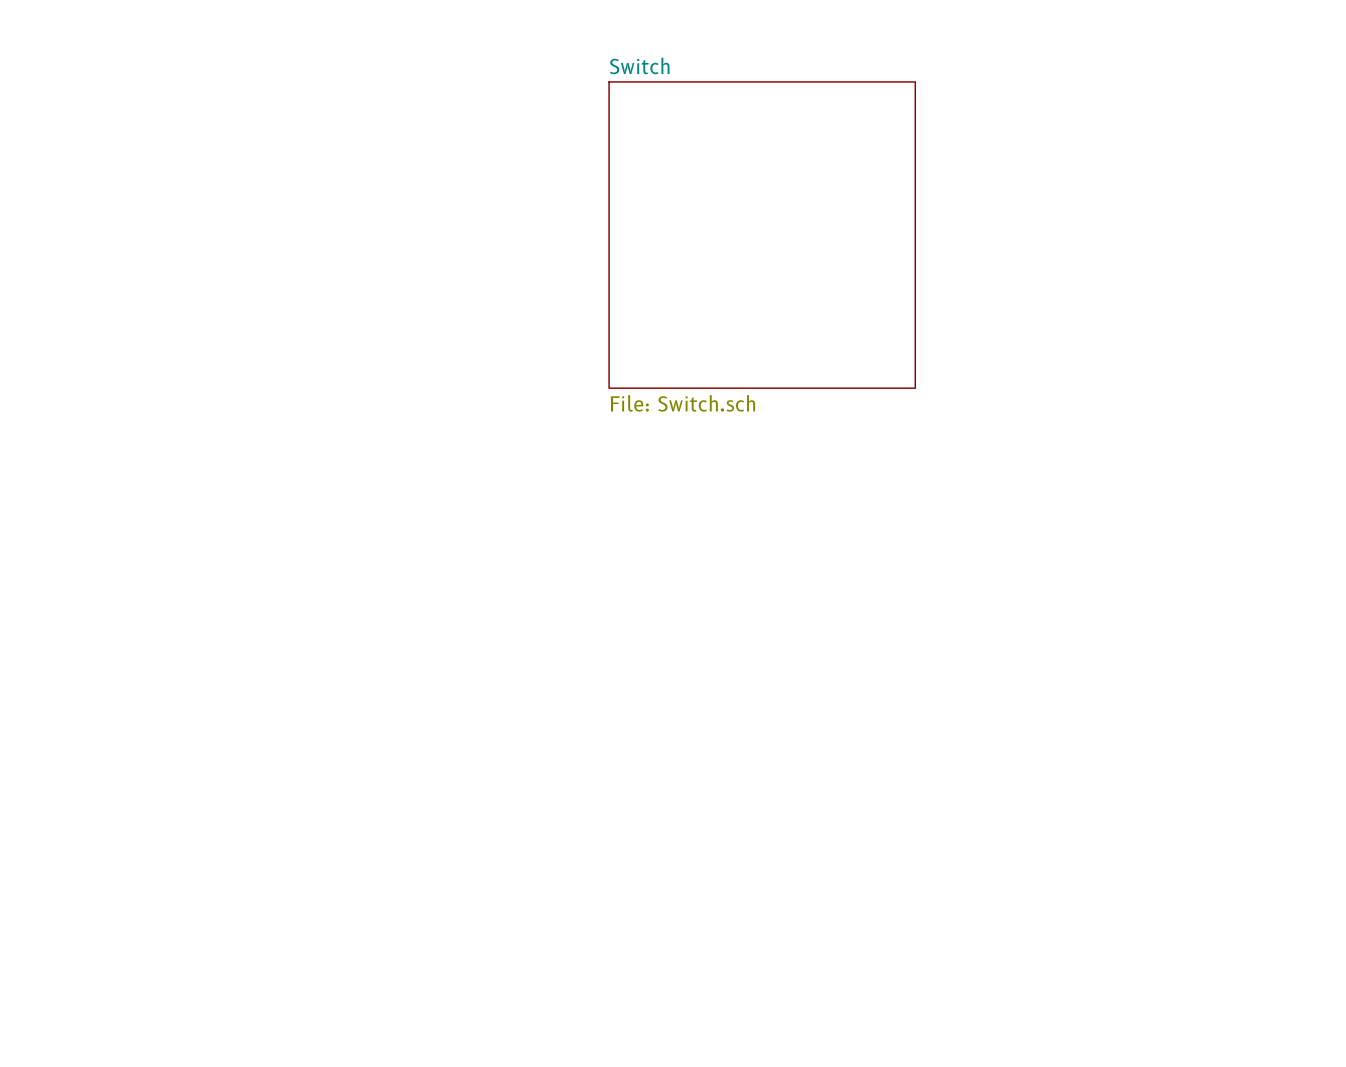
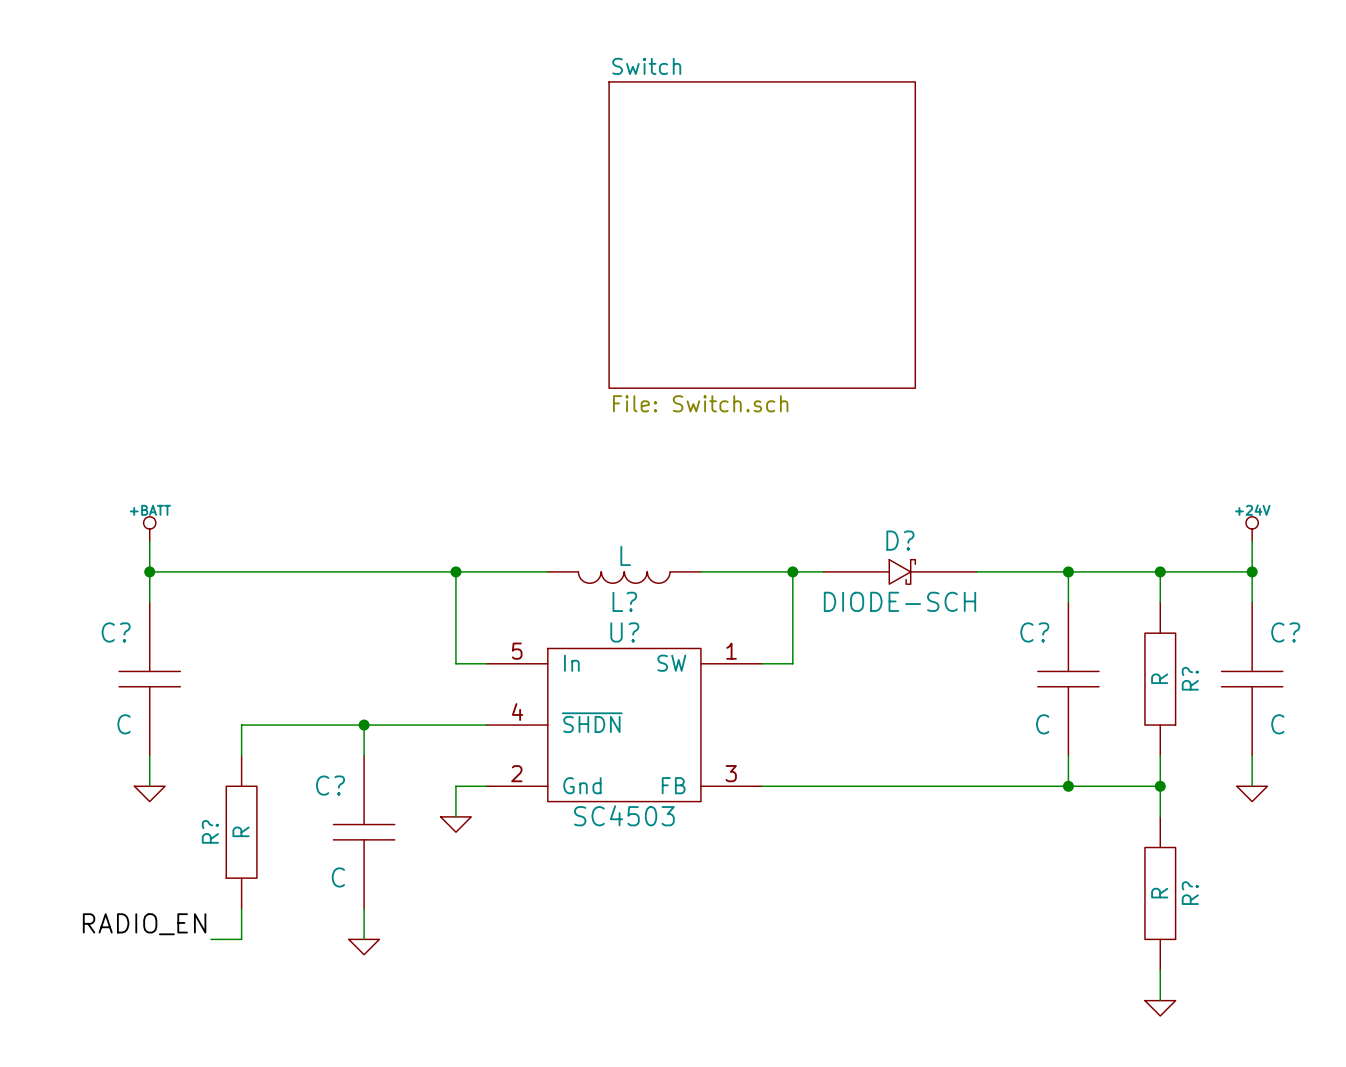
power symbol: none -> +BATT (149, 529)
power symbol: none -> +24V (1252, 529)
wire: none -> (149, 541) (149, 602)
wire: none -> (1252, 541) (1252, 602)
wire: none -> (149, 571) (547, 571)
junction: none -> (149, 571)
wire: none -> (455, 571) (455, 663) (486, 663)
junction: none -> (455, 571)
wire: none -> (700, 571) (823, 571)
wire: none -> (792, 571) (792, 663) (762, 663)
junction: none -> (792, 571)
D?: none -> DIODE-SCH (899, 571)
wire: none -> (976, 571) (1252, 571)
wire: none -> (1068, 571) (1068, 602)
junction: none -> (1068, 571)
wire: none -> (1160, 571) (1160, 602)
junction: none -> (1160, 571)
junction: none -> (1252, 571)
L?: none -> L (624, 577)
C?: none -> C (149, 679)
C?: none -> C (1068, 679)
R?: none -> R (1160, 679)
C?: none -> C (1252, 679)
wire: none -> (364, 725) (364, 755)
junction: none -> (364, 725)
wire: none -> (486, 725) (241, 725) (241, 755)
U?: none -> SC4503 (624, 725)
wire: none -> (149, 755) (149, 786)
wire: none -> (1068, 755) (1068, 786)
wire: none -> (1160, 755) (1160, 816)
wire: none -> (1252, 755) (1252, 786)
wire: none -> (486, 786) (455, 786) (455, 816)
wire: none -> (762, 786) (1160, 786)
junction: none -> (1068, 786)
junction: none -> (1160, 786)
power symbol: none -> (149, 793)
power symbol: none -> (1252, 793)
power symbol: none -> (455, 824)
R?: none -> R (241, 832)
C?: none -> C (364, 832)
R?: none -> R (1160, 893)
wire: none -> (241, 908) (241, 939) (210, 939)
wire: none -> (364, 908) (364, 939)
label: none -> RADIO_EN (144, 924)
power symbol: none -> (364, 947)
wire: none -> (1160, 970) (1160, 1000)
power symbol: none -> (1160, 1008)

